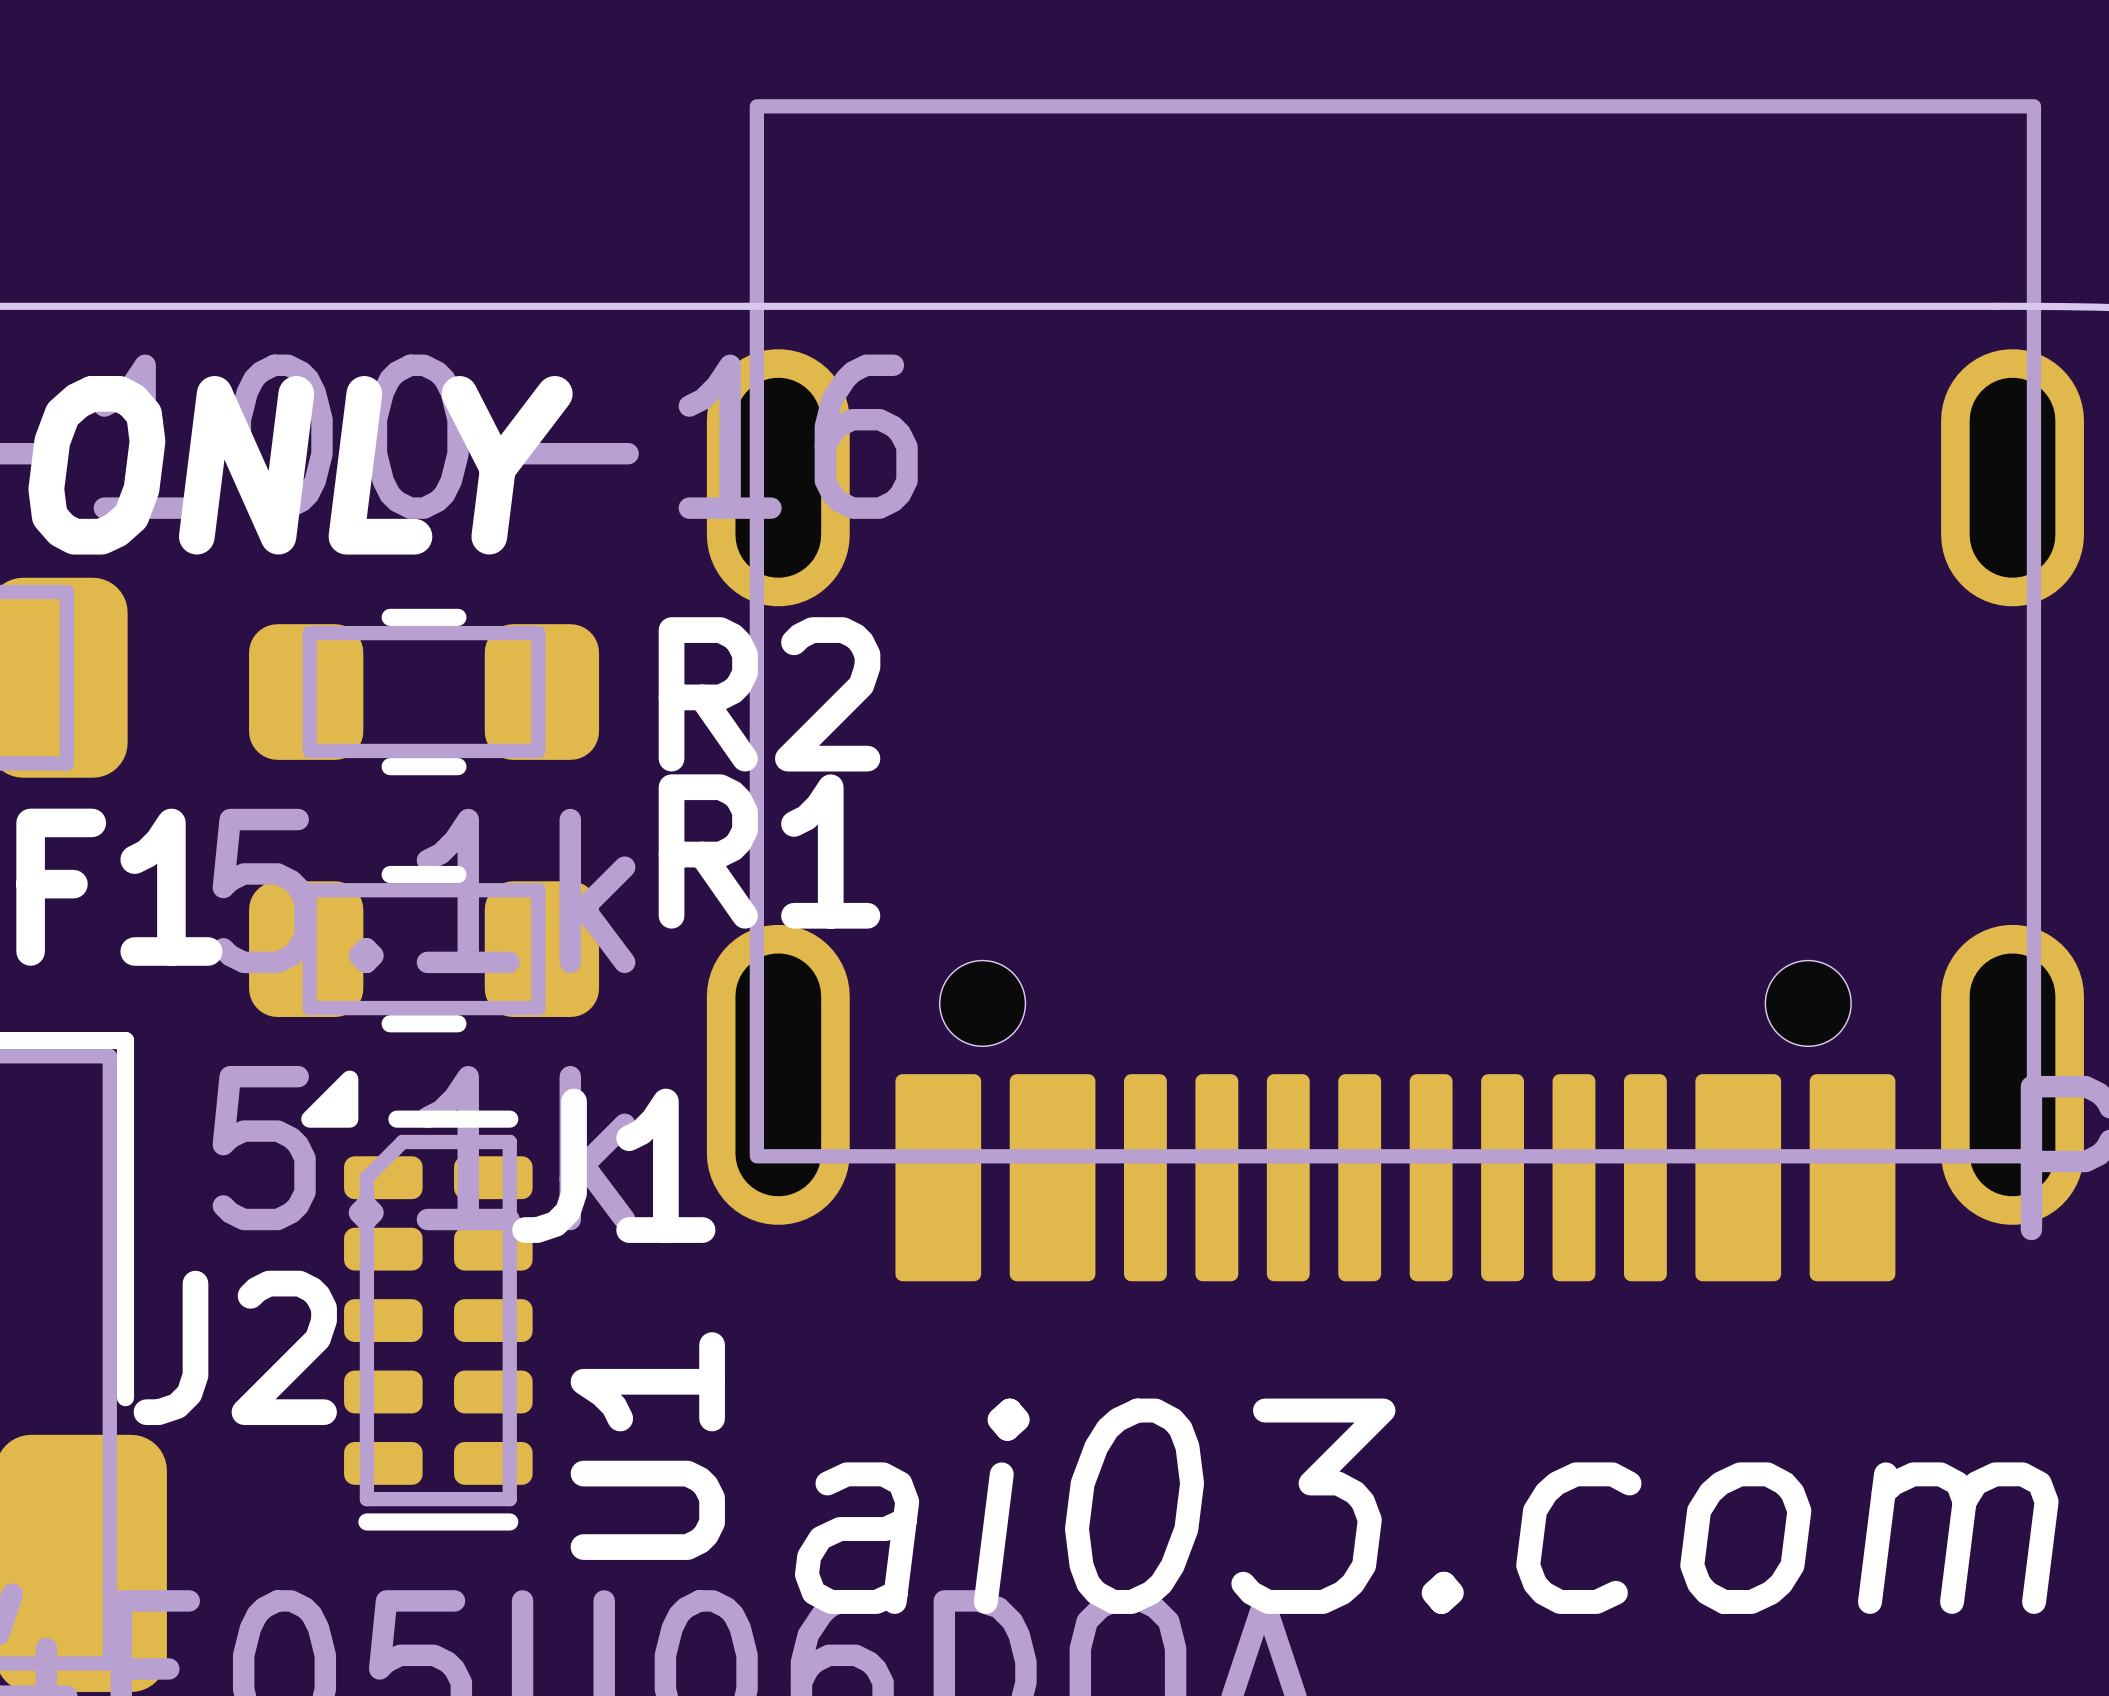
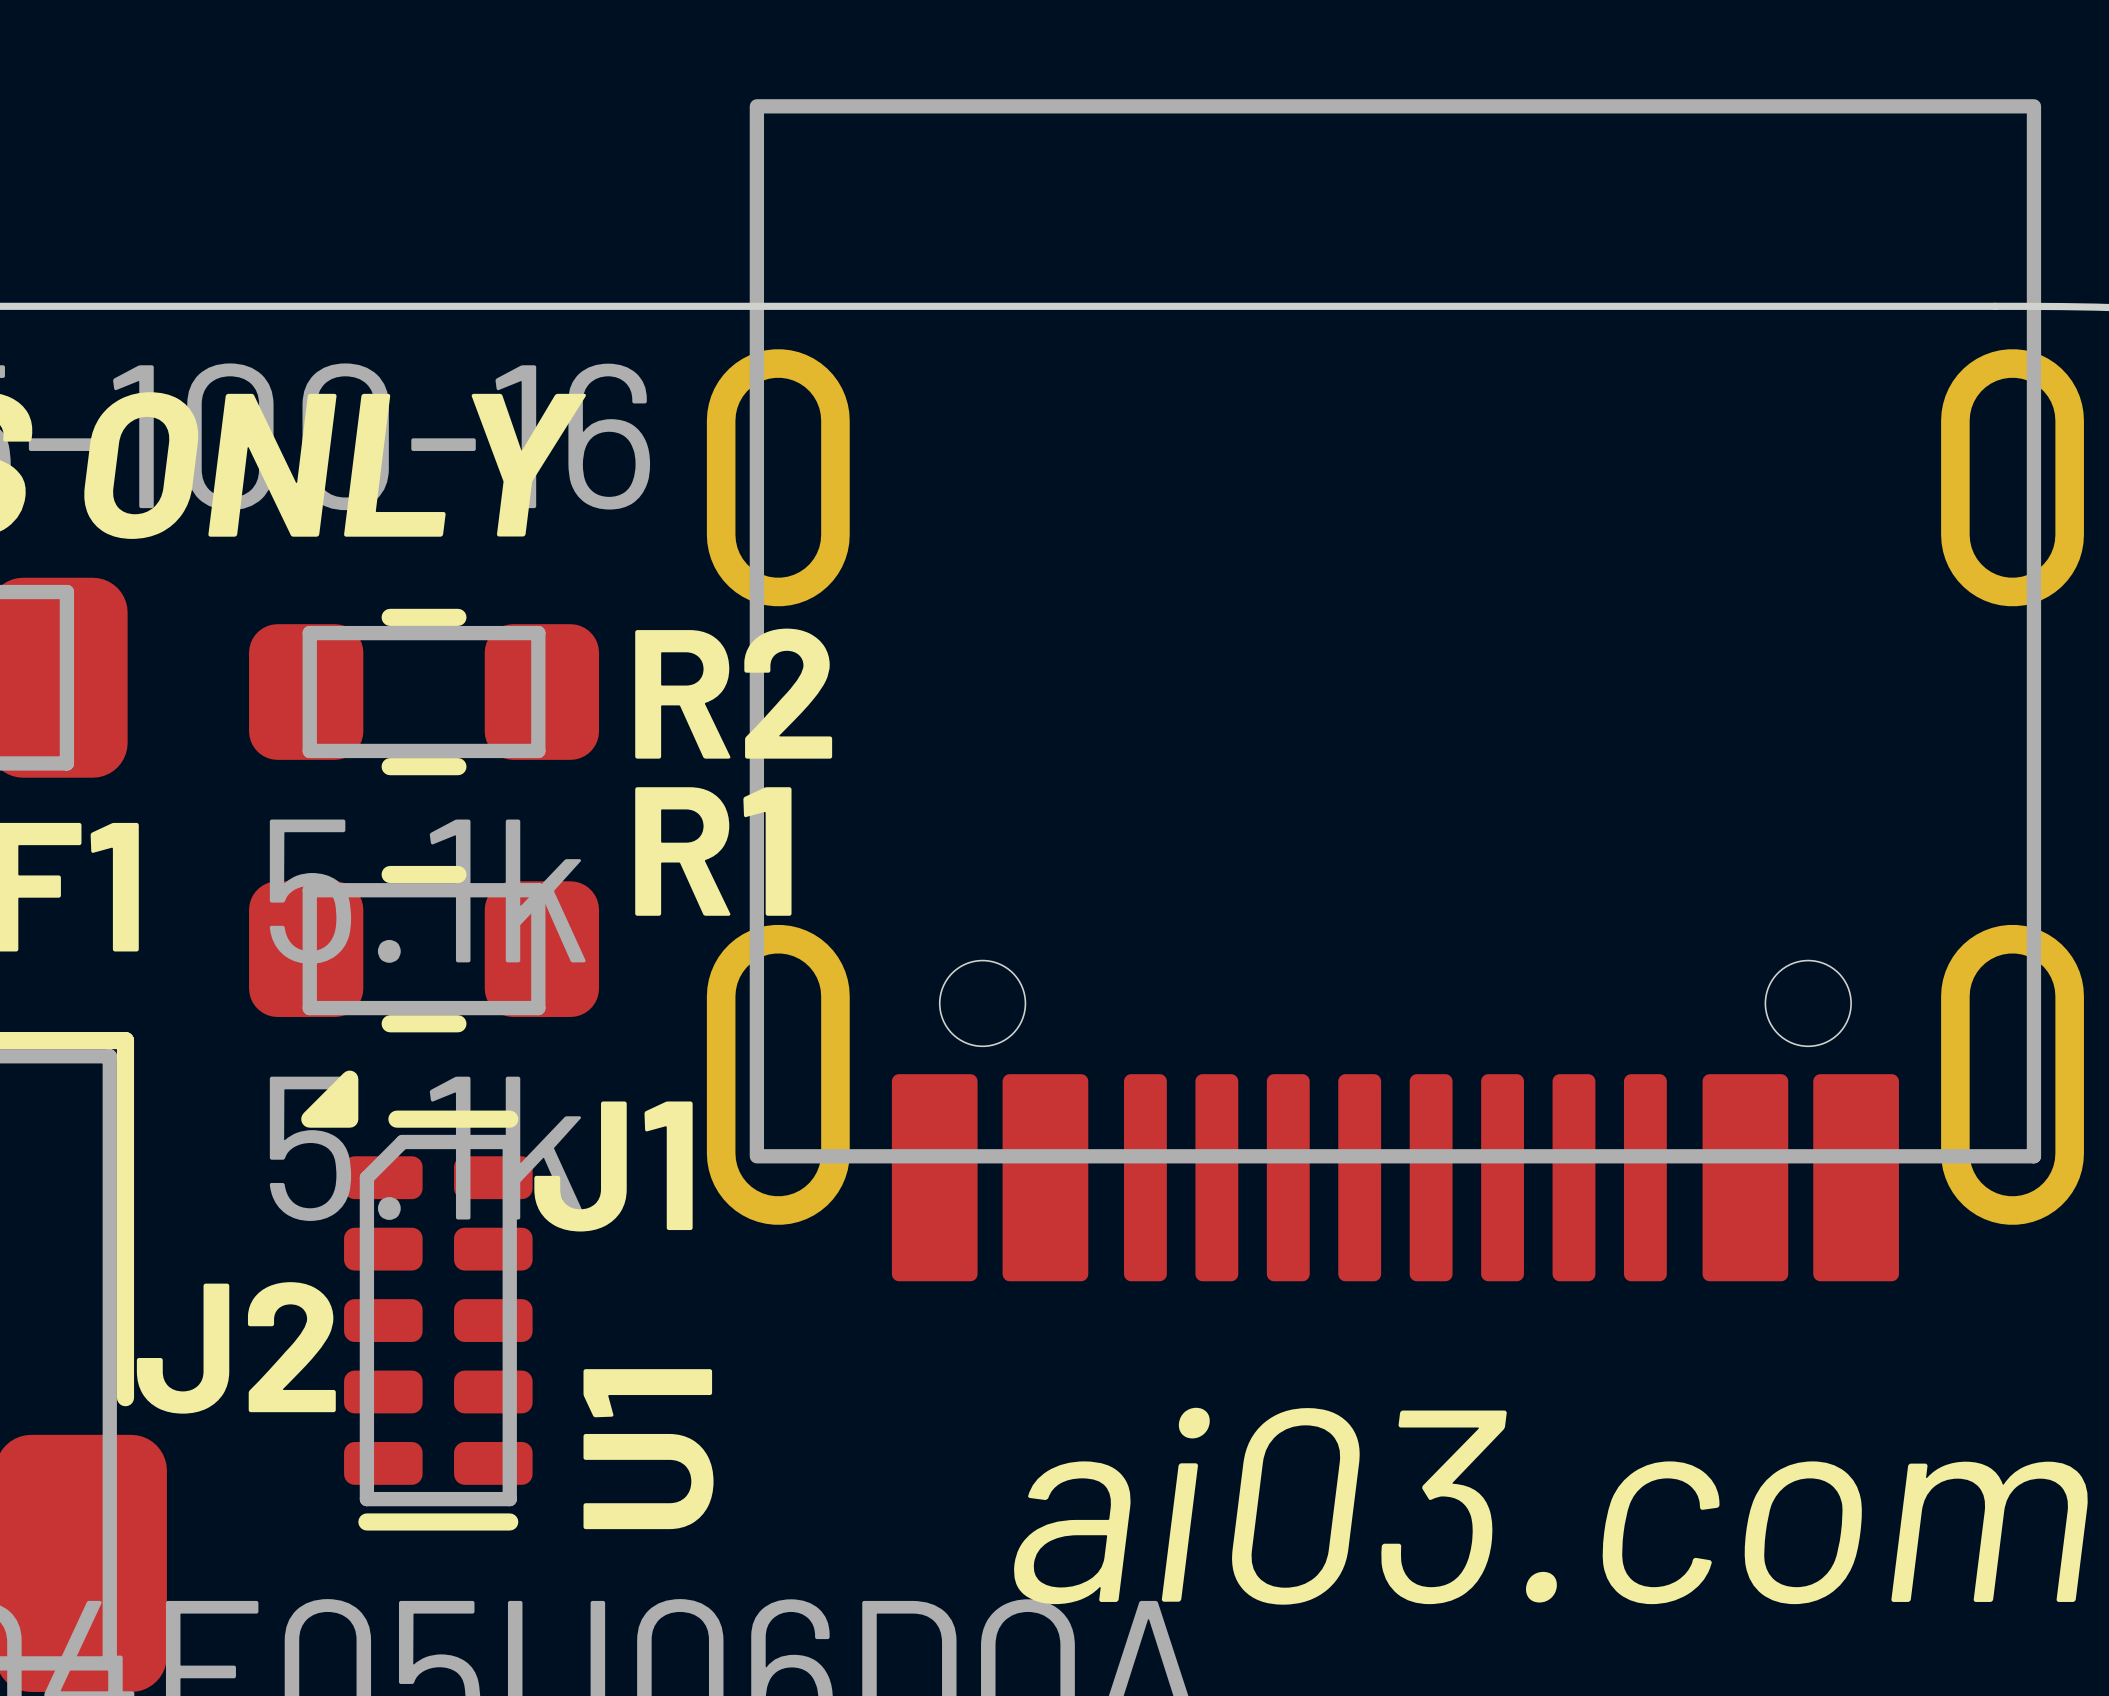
J1 footprint: [706, 99, 2084, 1282] -> [706, 99, 2084, 1282]

